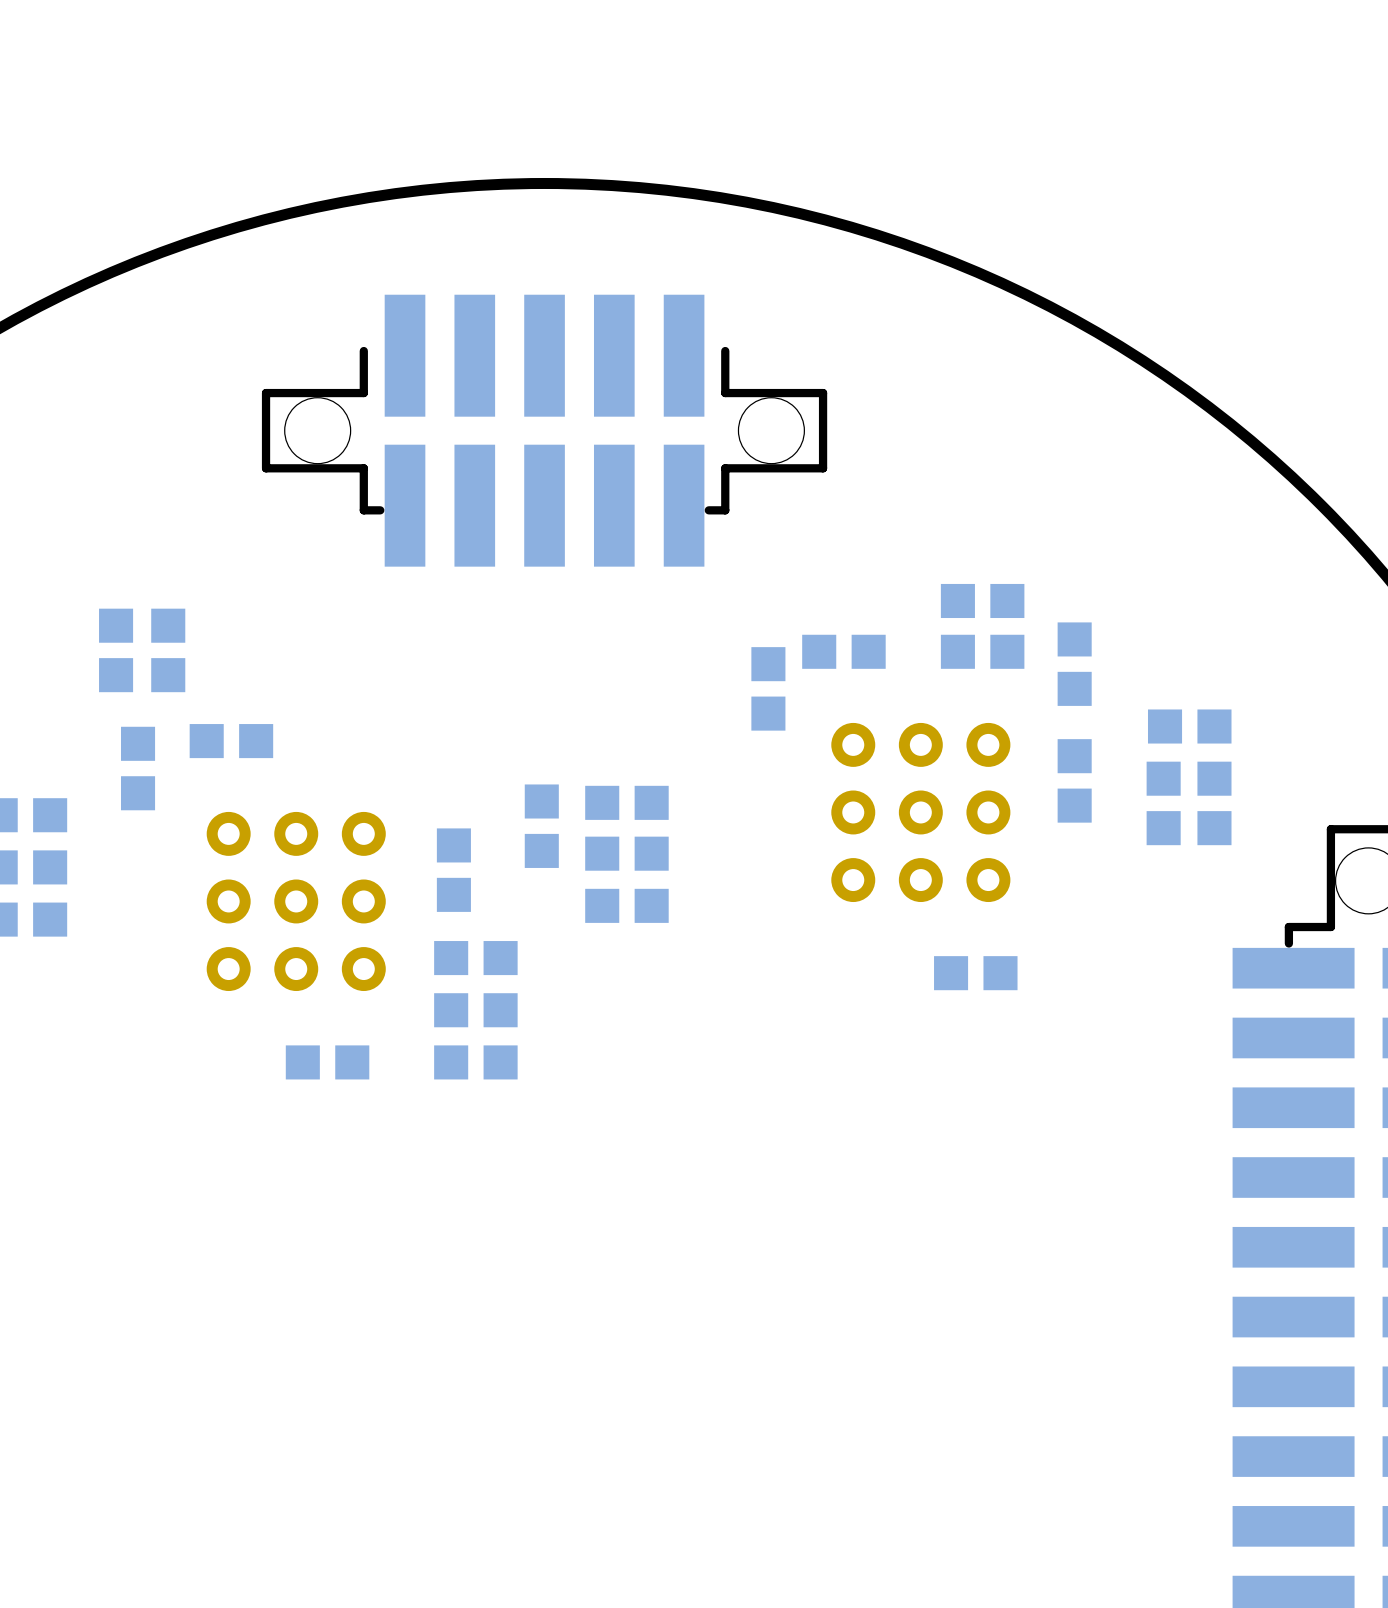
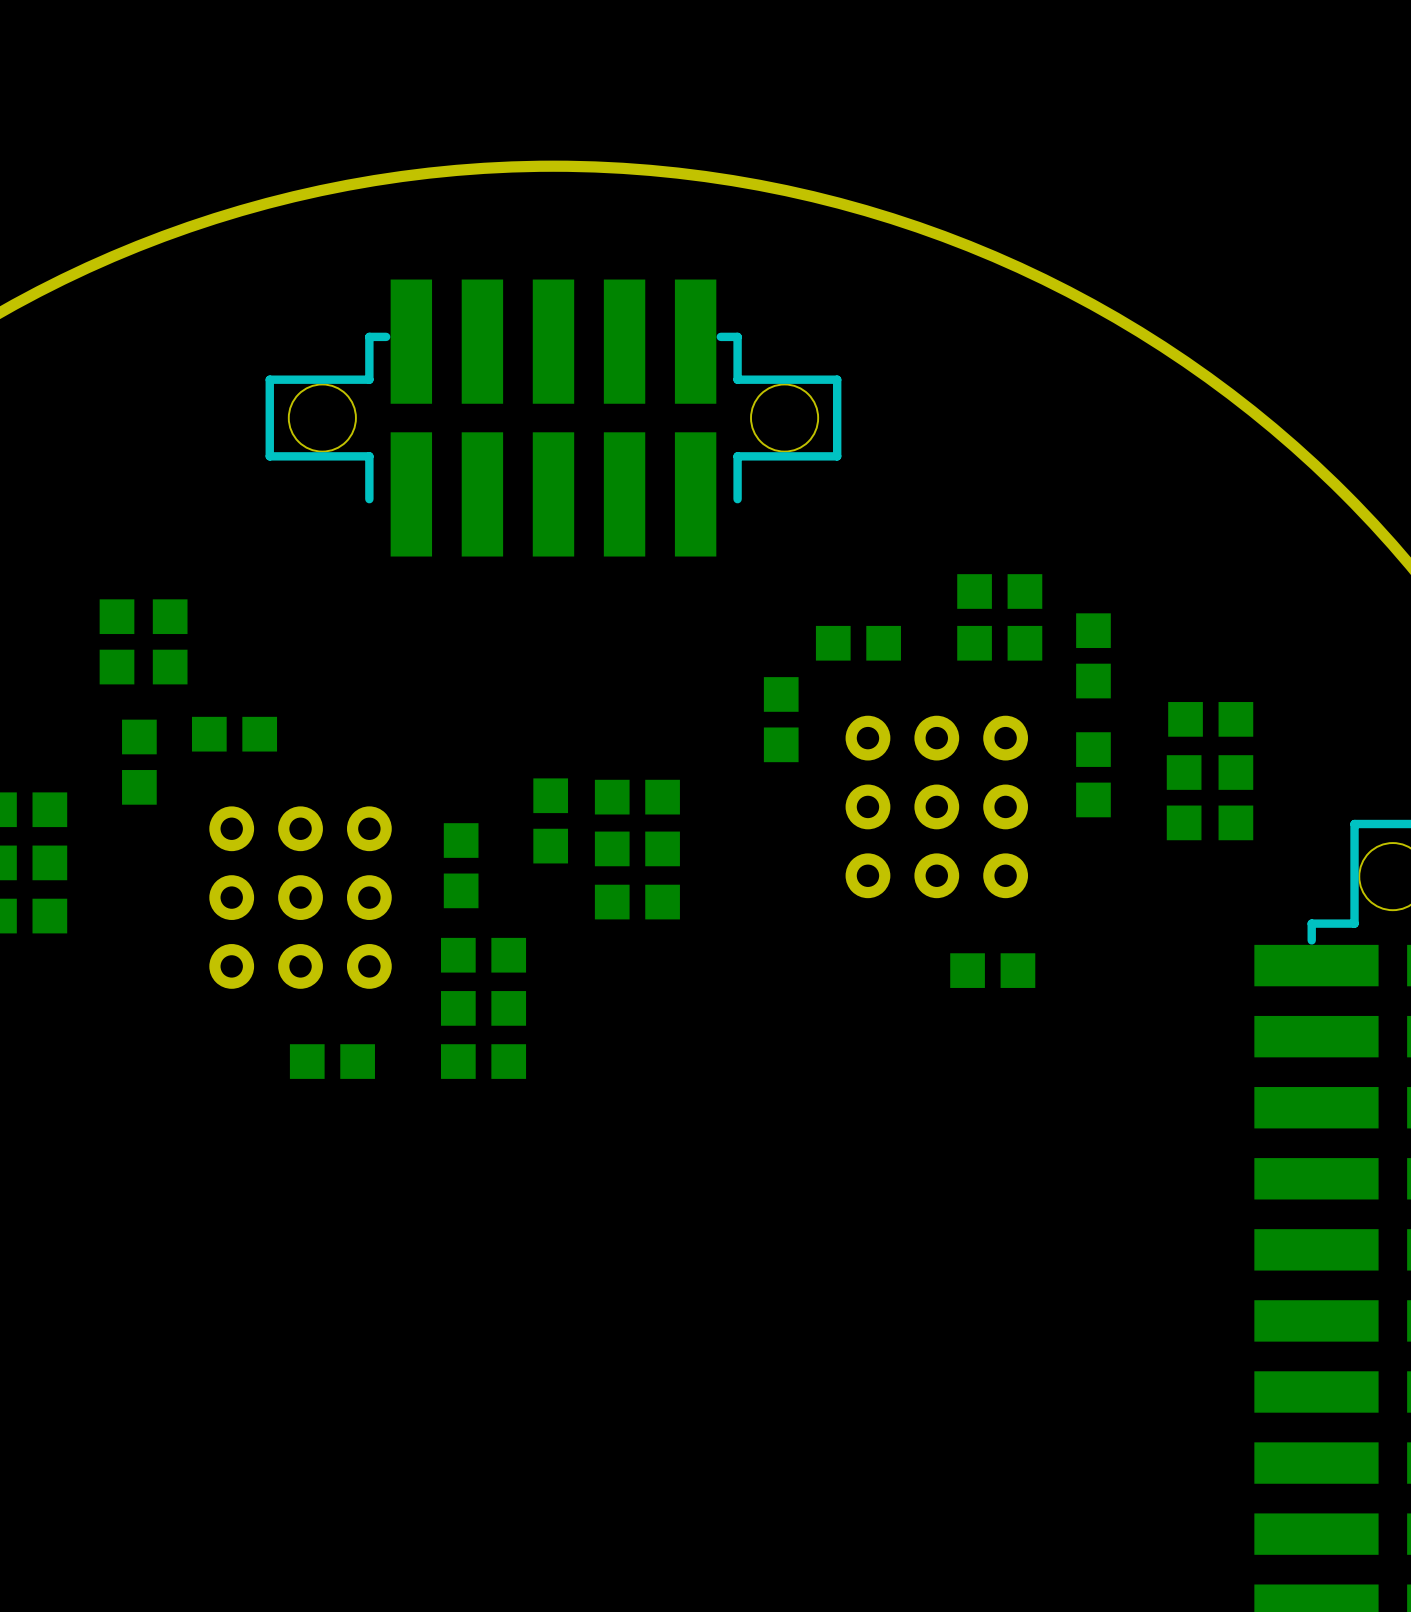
part rotation: 0° (544, 430) -> 180° (553, 418)
part position: (768, 688) -> (781, 719)

